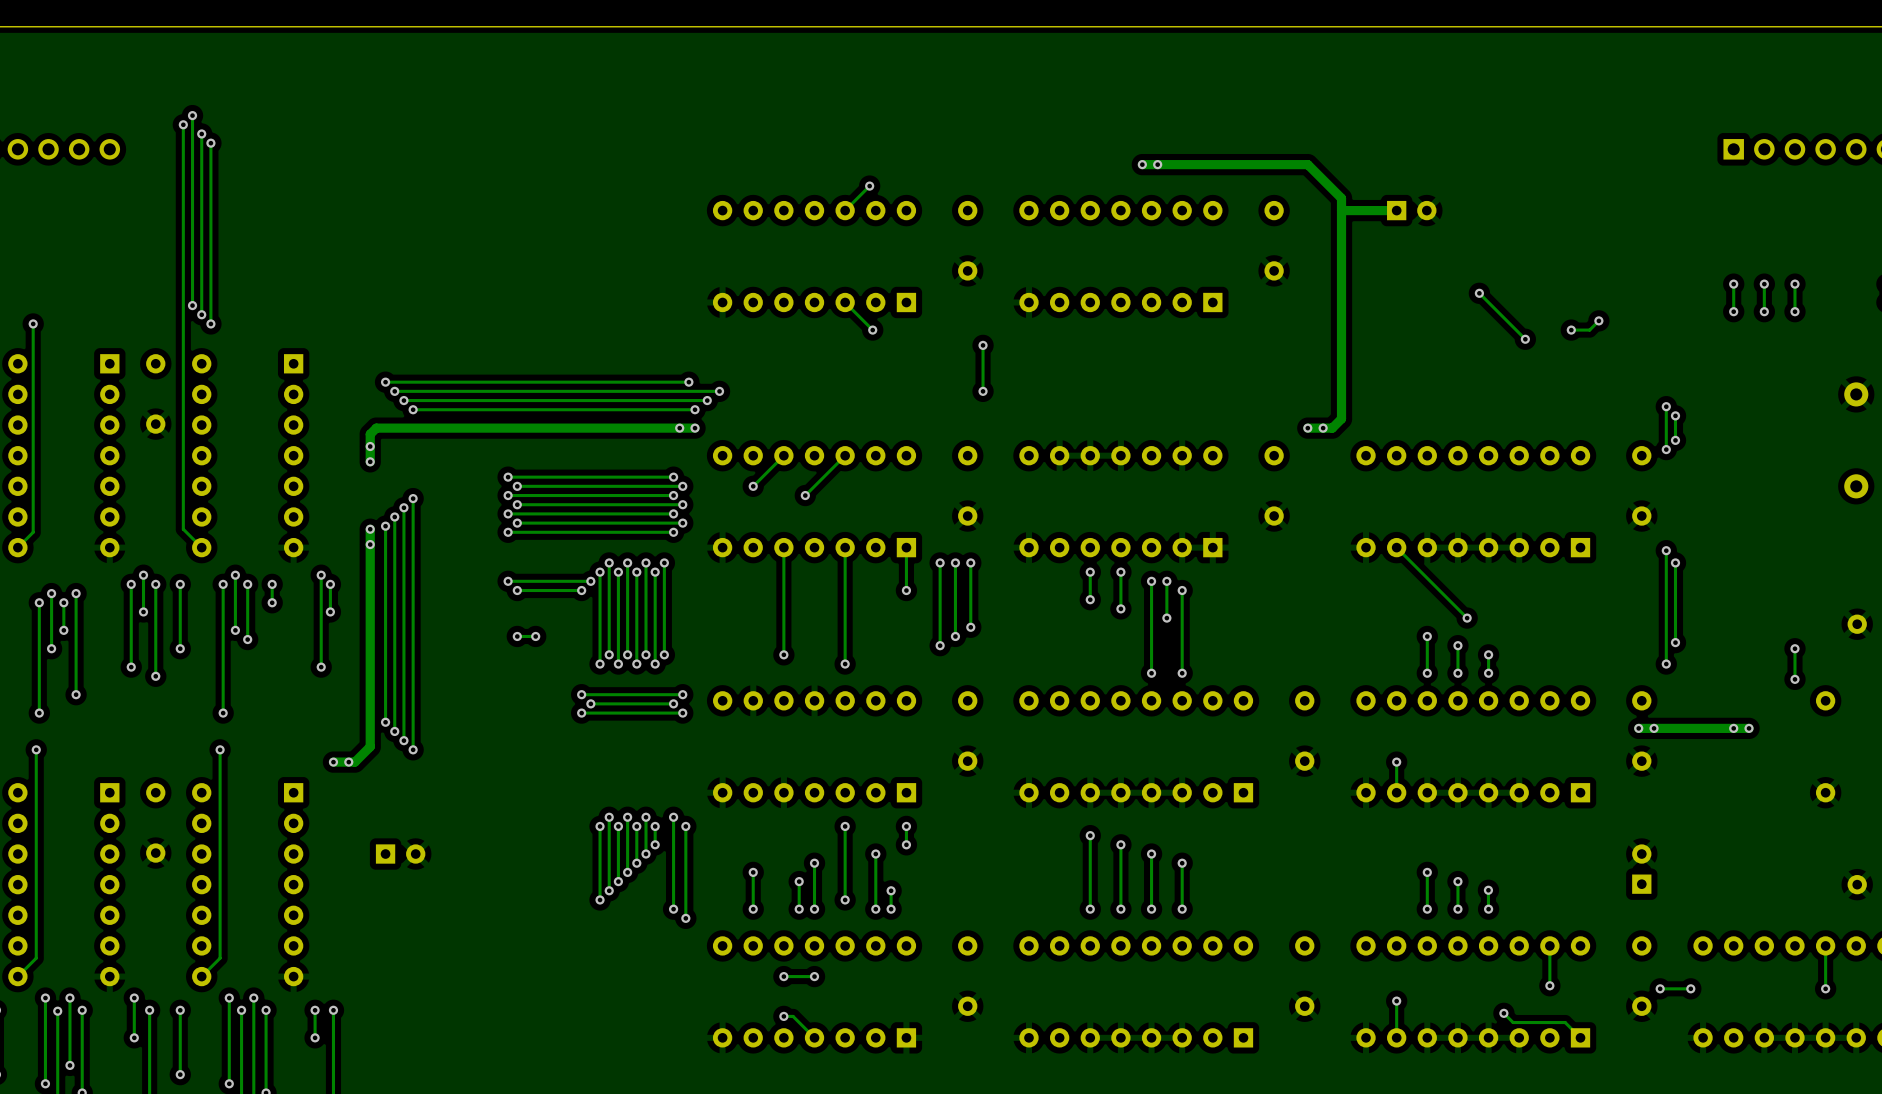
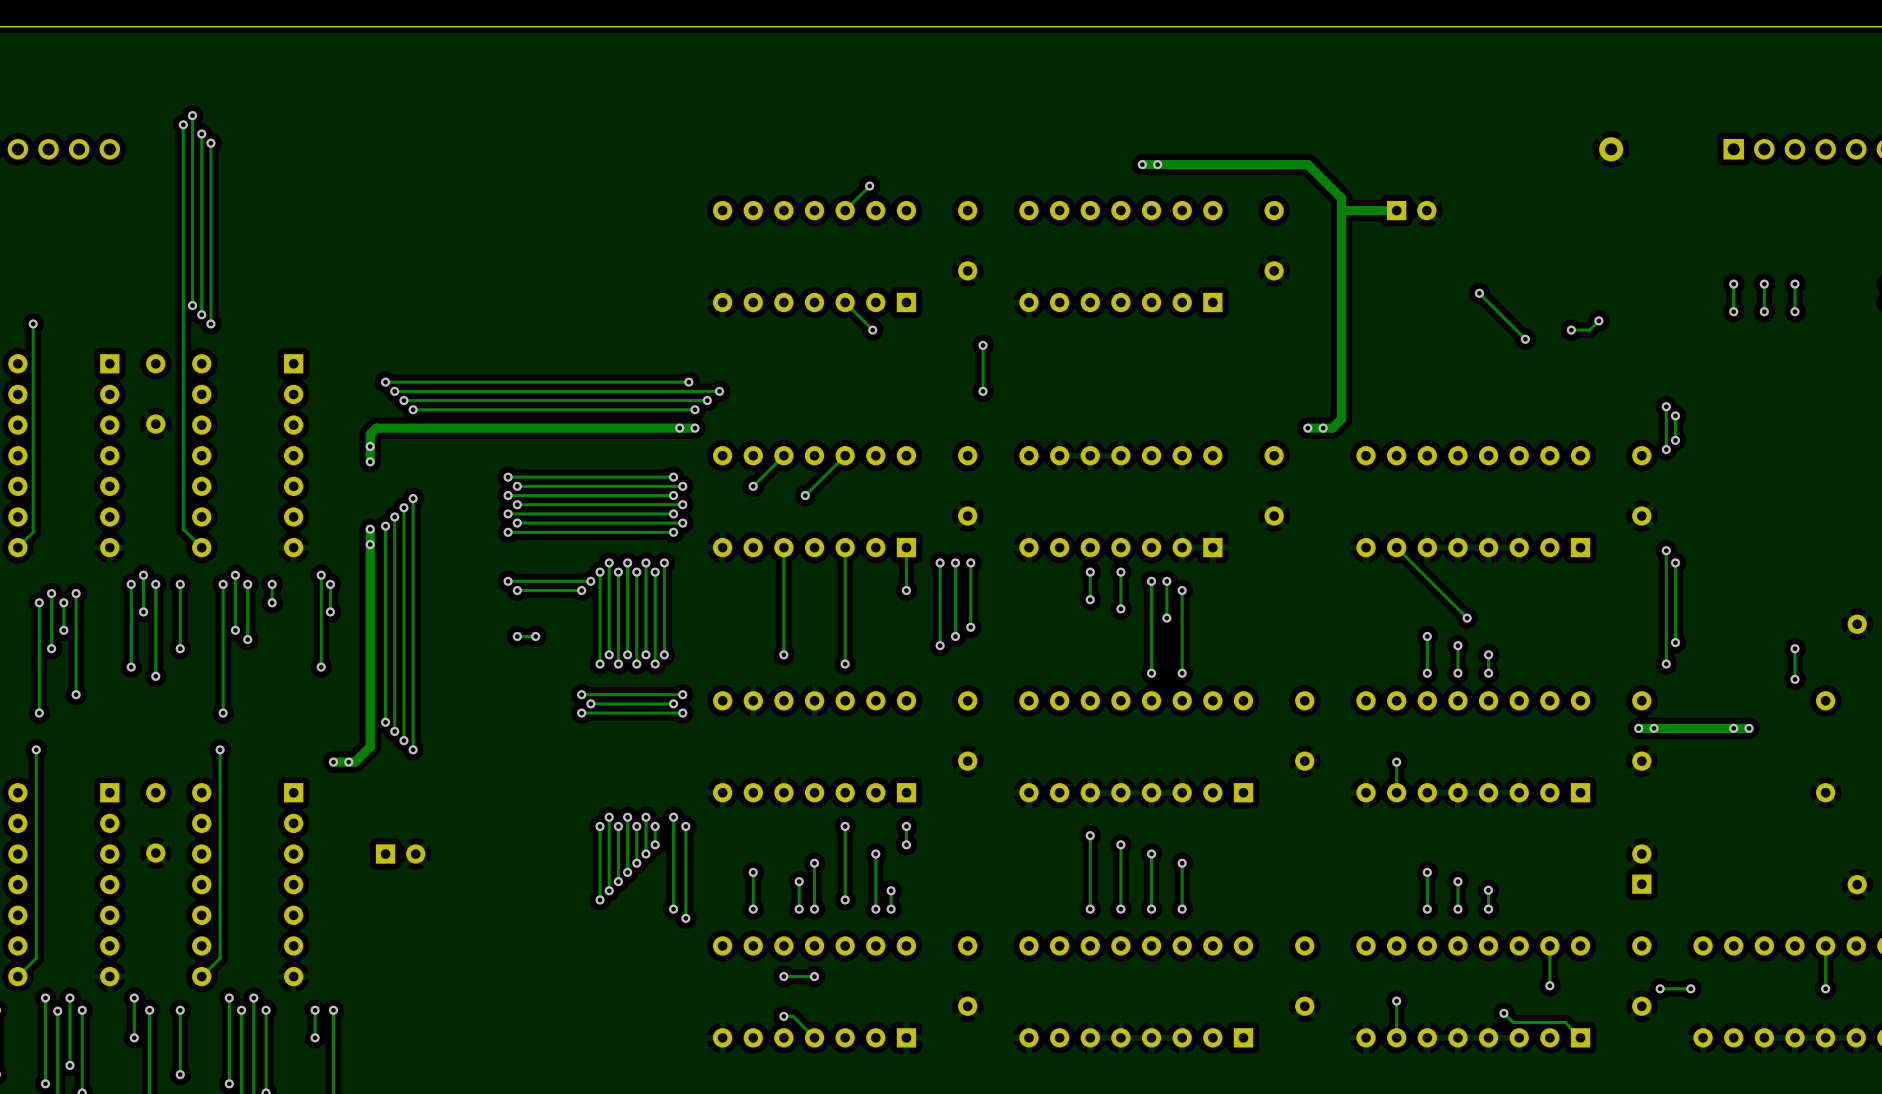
part: none -> (1611, 149)
part: (1856, 394) -> none
part: (1856, 486) -> none

